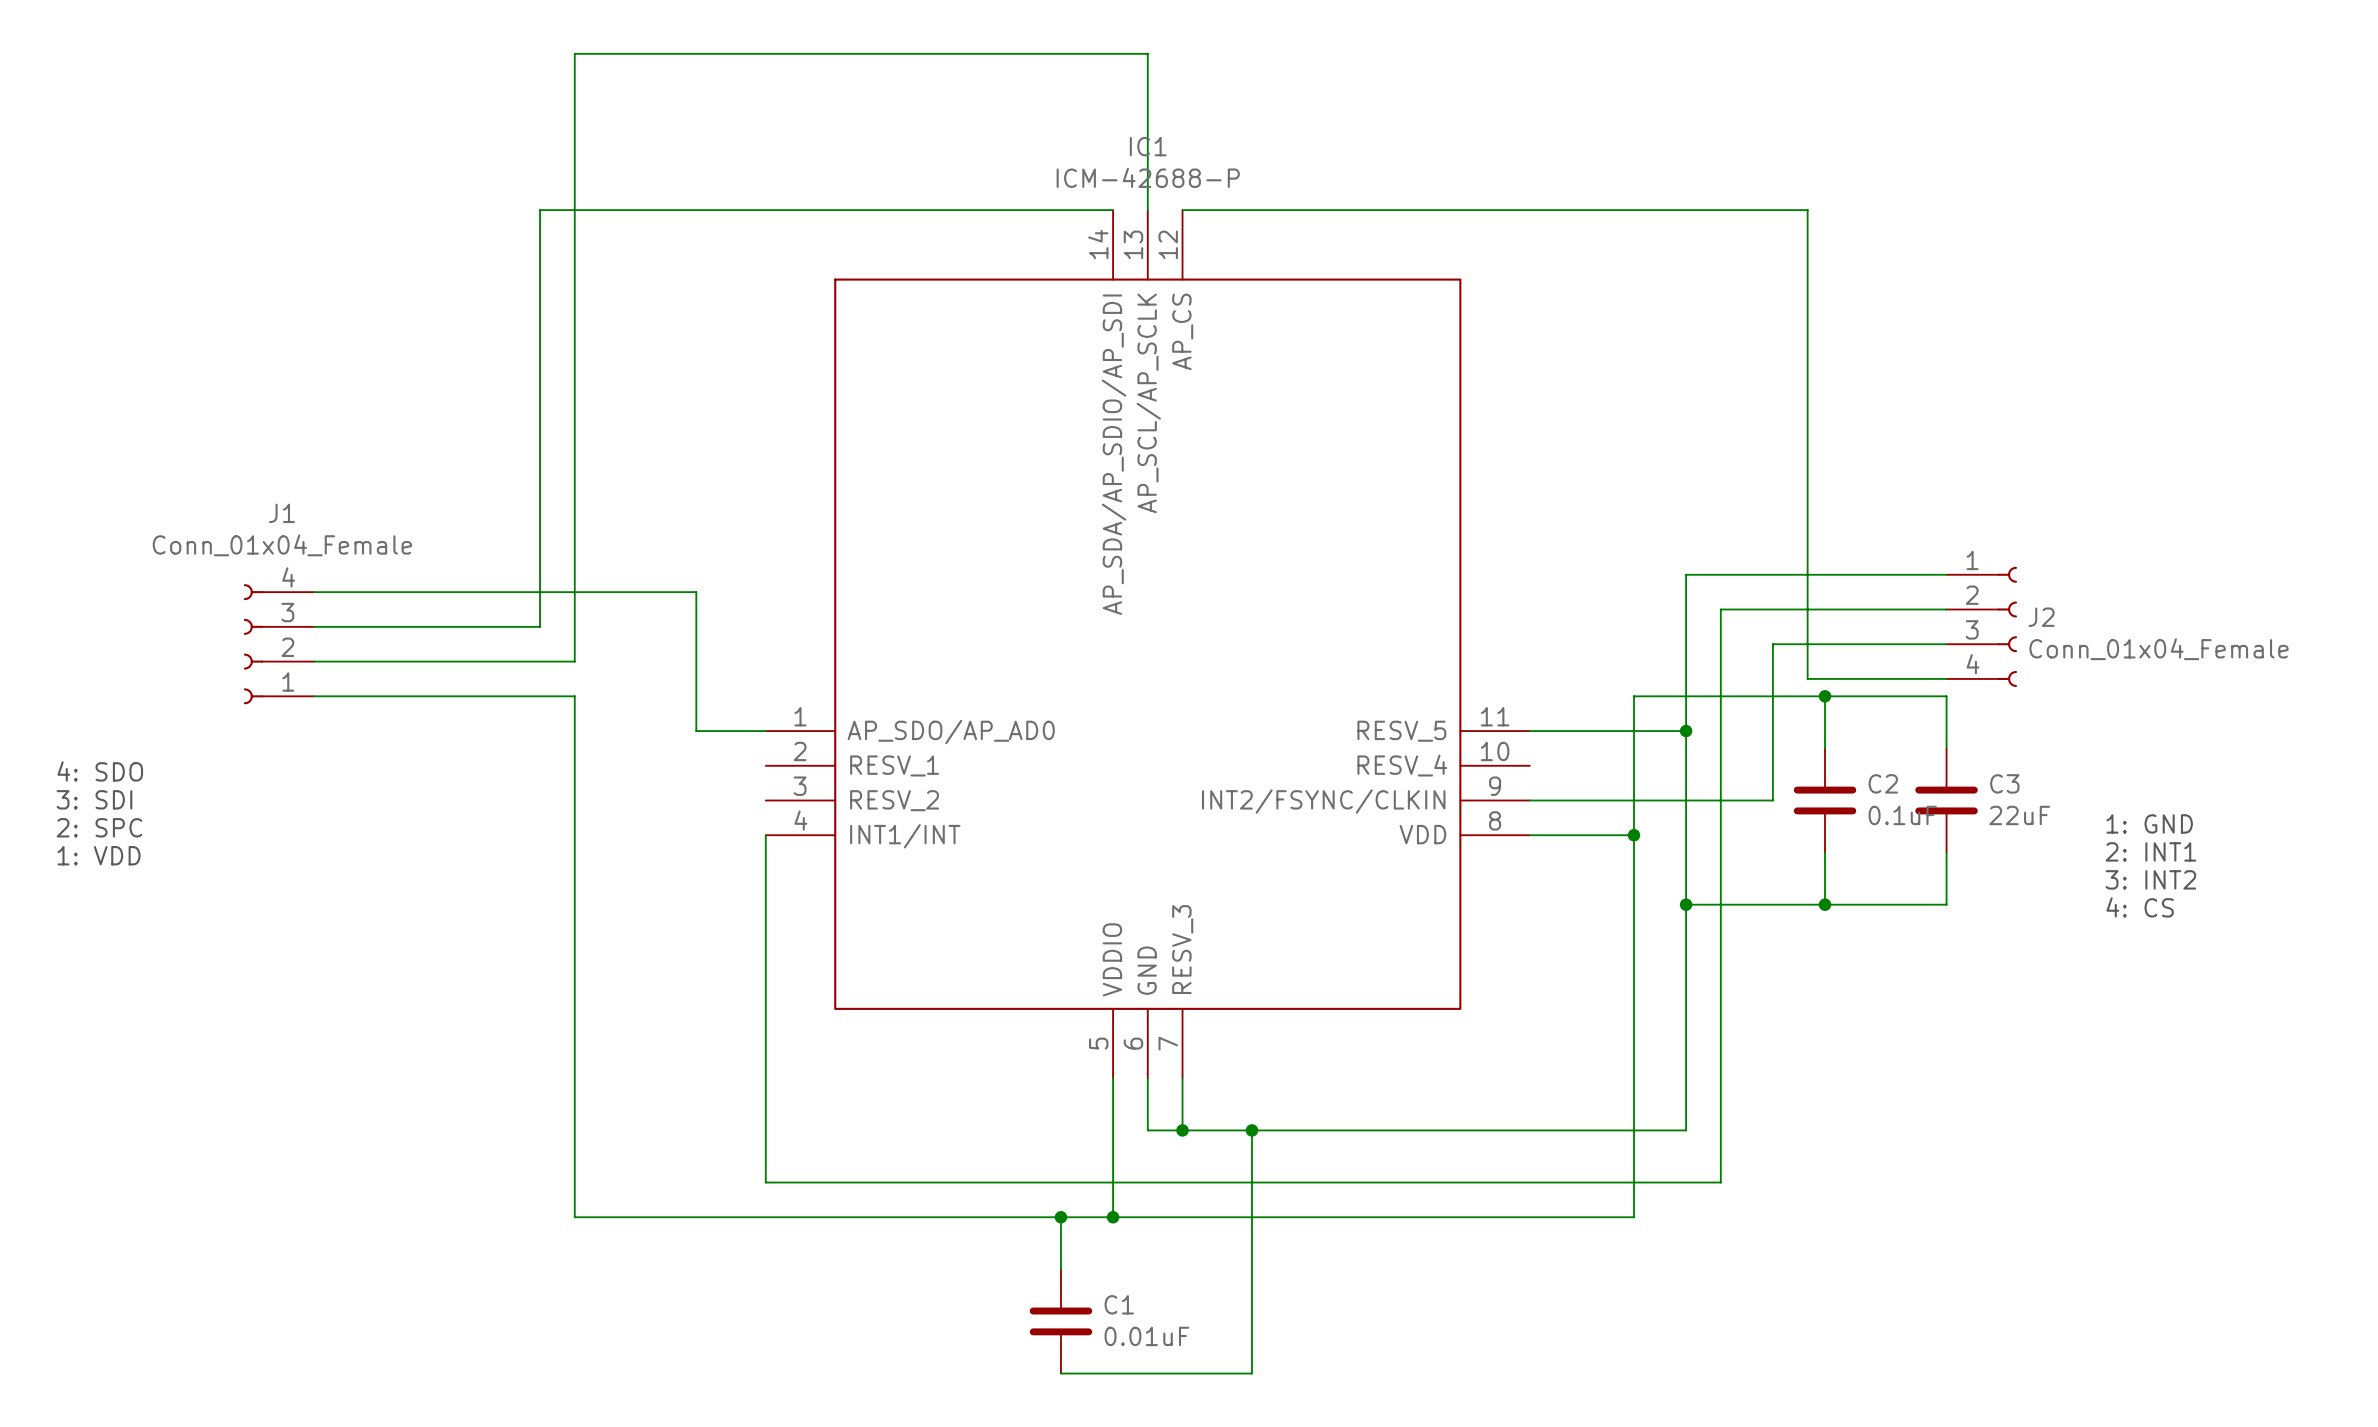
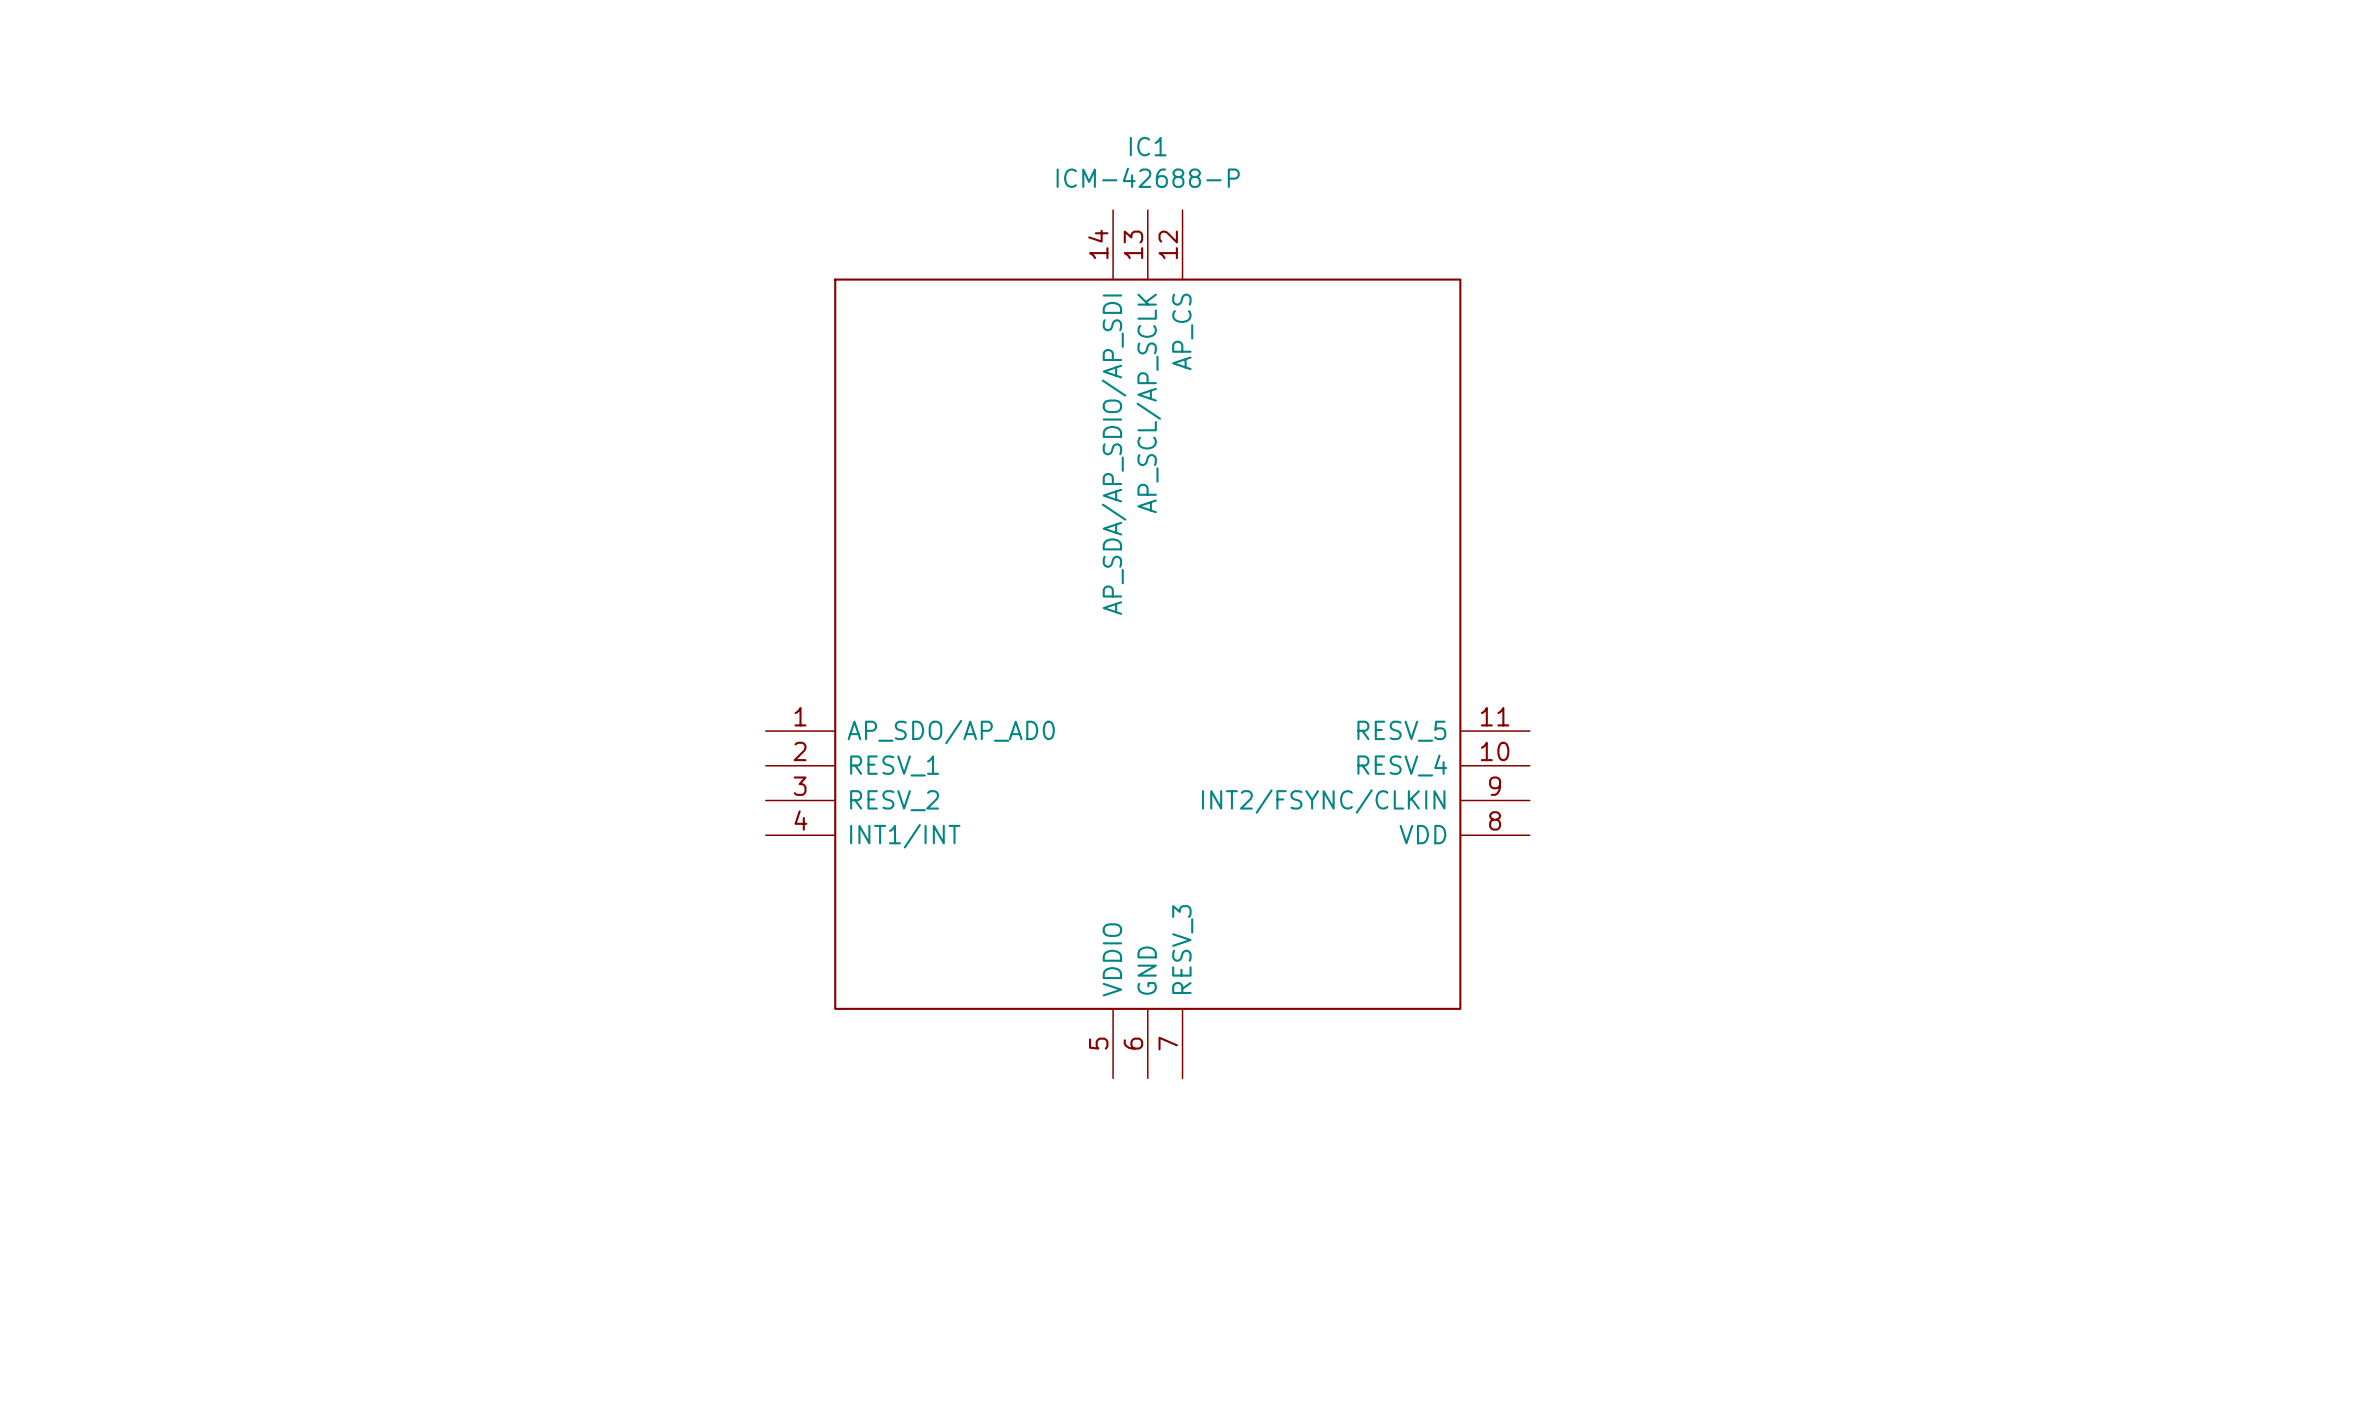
wire: (1113, 210) (540, 210) (540, 626) (314, 626) -> none
wire: (1147, 210) (1147, 53) (574, 53) (574, 661) (314, 661) -> none
wire: (1182, 210) (1807, 210) (1807, 678) (1946, 678) -> none
wire: (1946, 574) (1686, 574) (1686, 1130) (1147, 1130) (1147, 1078) -> none
wire: (314, 592) (696, 592) (696, 731) (765, 731) -> none
wire: (1946, 609) (1720, 609) (1720, 1182) (765, 1182) (765, 835) -> none
J2: Conn_01x04_Female (1981, 626) -> none
J1: Conn_01x04_Female (279, 644) -> none
wire: (1946, 644) (1772, 644) (1772, 800) (1529, 800) -> none
wire: (314, 696) (574, 696) (574, 1217) (1634, 1217) (1634, 696) (1946, 696) (1946, 748) -> none
wire: (1825, 696) (1825, 748) -> none
junction: (1825, 696) -> none
wire: (1529, 731) (1686, 731) -> none
junction: (1686, 731) -> none
text: 4: SDO (100, 771) -> none
text: 3: SDI (94, 799) -> none
C2: 0.1uF (1825, 800) -> none
C3: 22uF (1946, 800) -> none
text: 1: GND (2149, 823) -> none
text: 2: SPC (99, 827) -> none
wire: (1529, 835) (1634, 835) -> none
junction: (1634, 835) -> none
text: 2: INT1 (2150, 851) -> none
wire: (1825, 852) (1825, 904) -> none
wire: (1946, 852) (1946, 904) (1686, 904) -> none
text: 1: VDD (99, 855) -> none
text: 3: INT2 (2150, 879) -> none
junction: (1686, 904) -> none
junction: (1825, 904) -> none
text: 4: CS (2140, 907) -> none
wire: (1113, 1078) (1113, 1217) -> none
wire: (1182, 1078) (1182, 1130) -> none
junction: (1182, 1130) -> none
wire: (1251, 1130) (1251, 1373) (1060, 1373) -> none
junction: (1251, 1130) -> none
wire: (1060, 1217) (1060, 1269) -> none
junction: (1060, 1217) -> none
junction: (1113, 1217) -> none
C1: 0.01uF (1060, 1321) -> none

